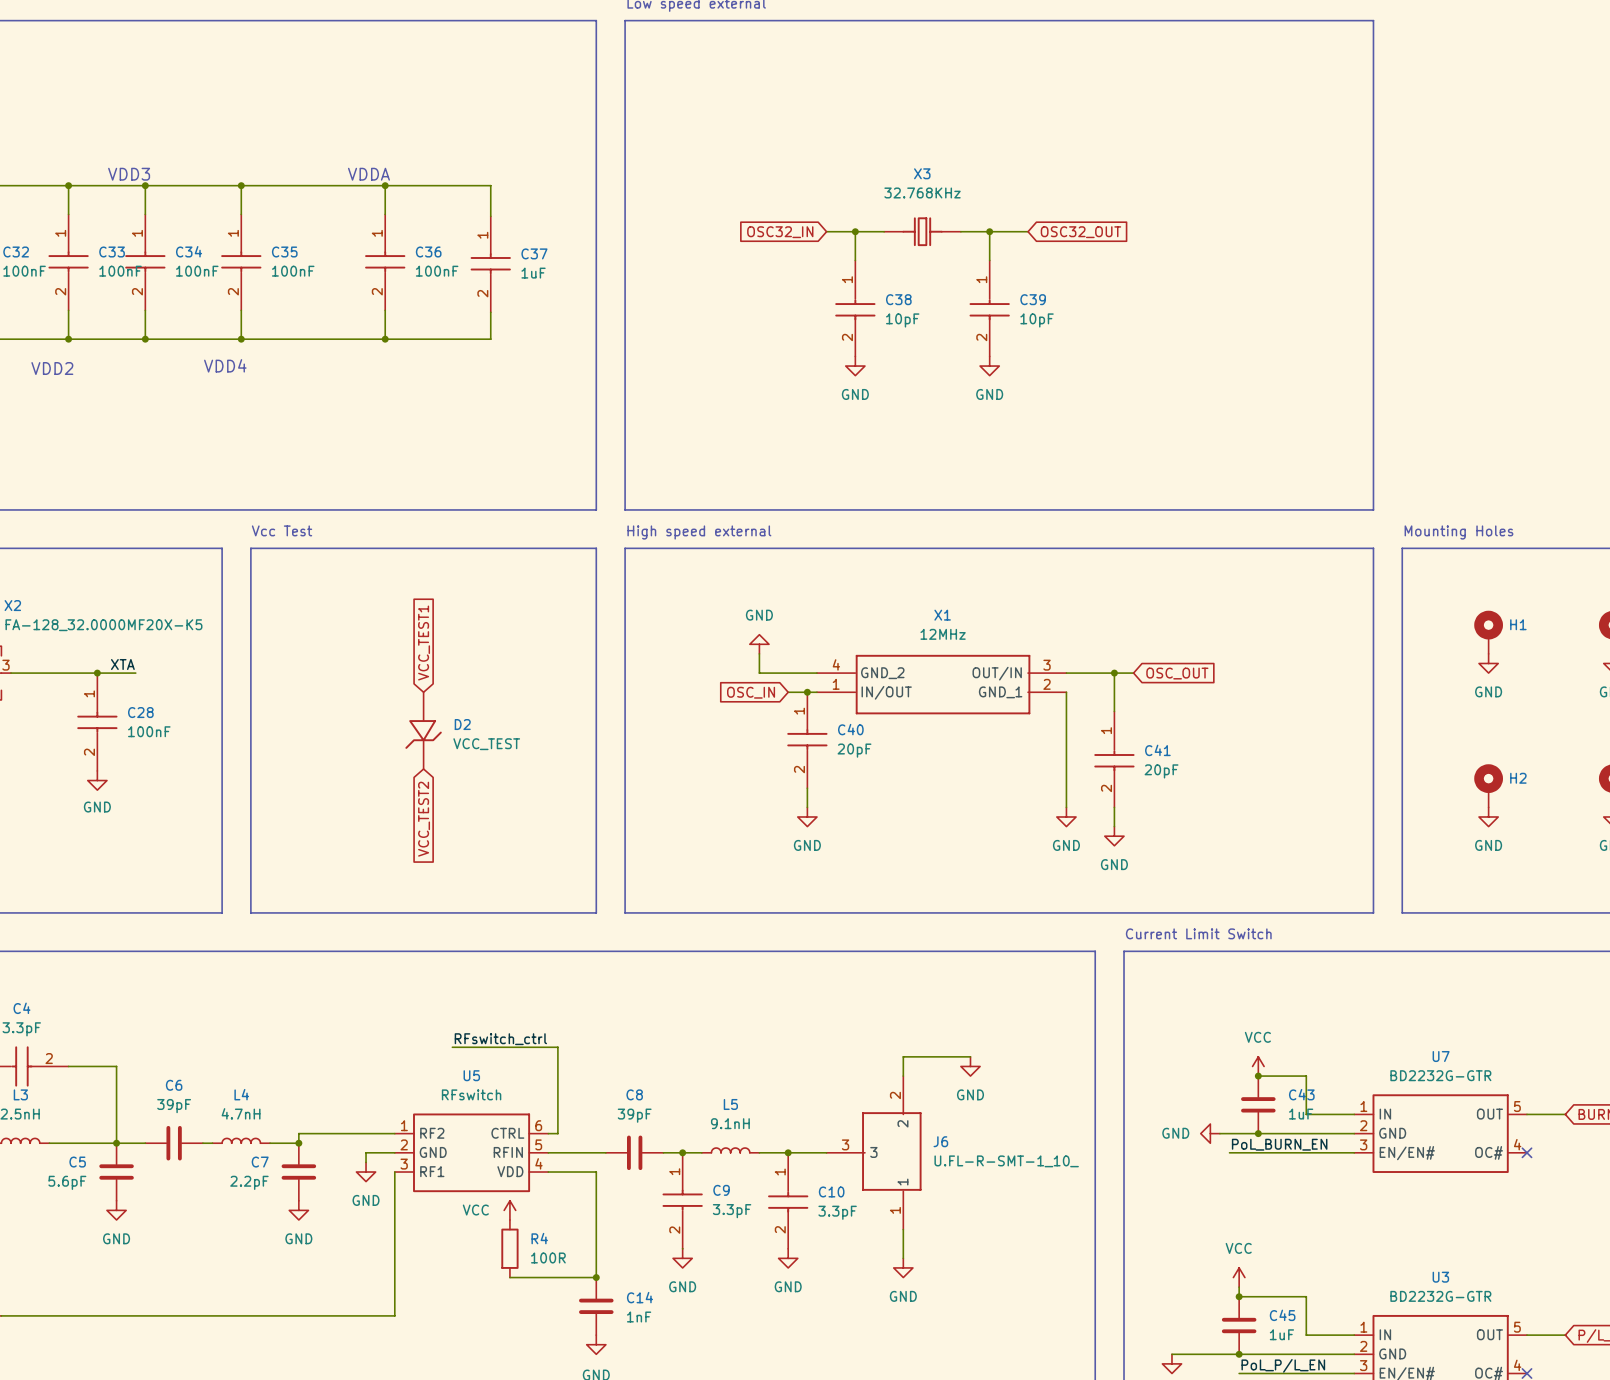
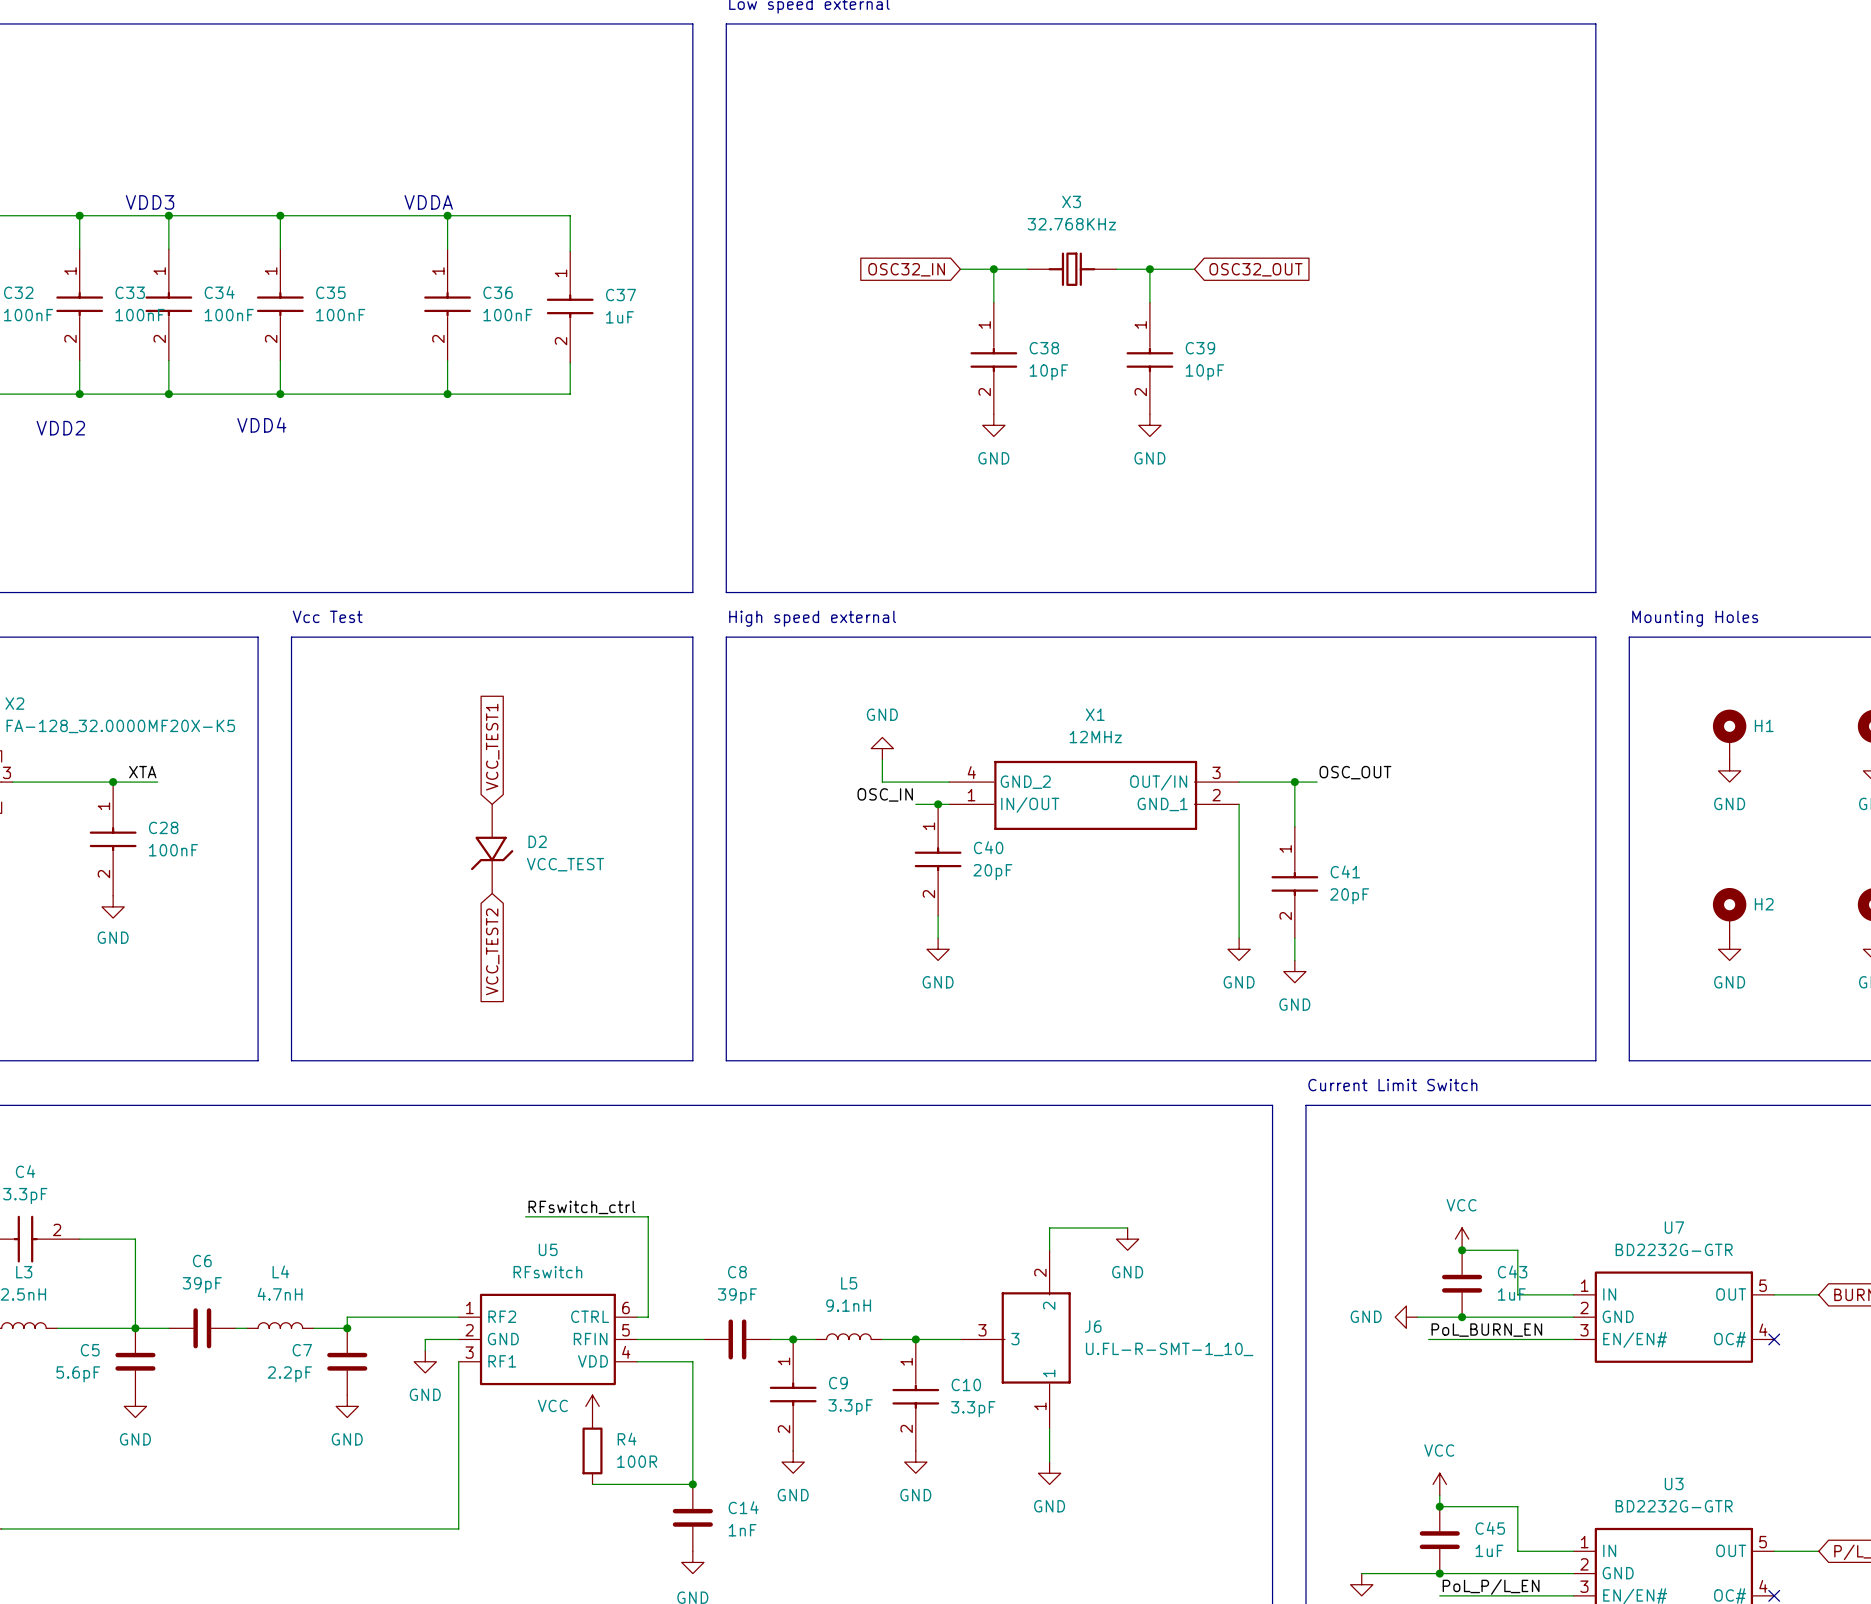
label: none -> OSC_OUT (1355, 772)
global label: OSC_OUT (1177, 673) -> none
label: none -> OSC_IN (885, 794)
global label: OSC_IN (751, 692) -> none

